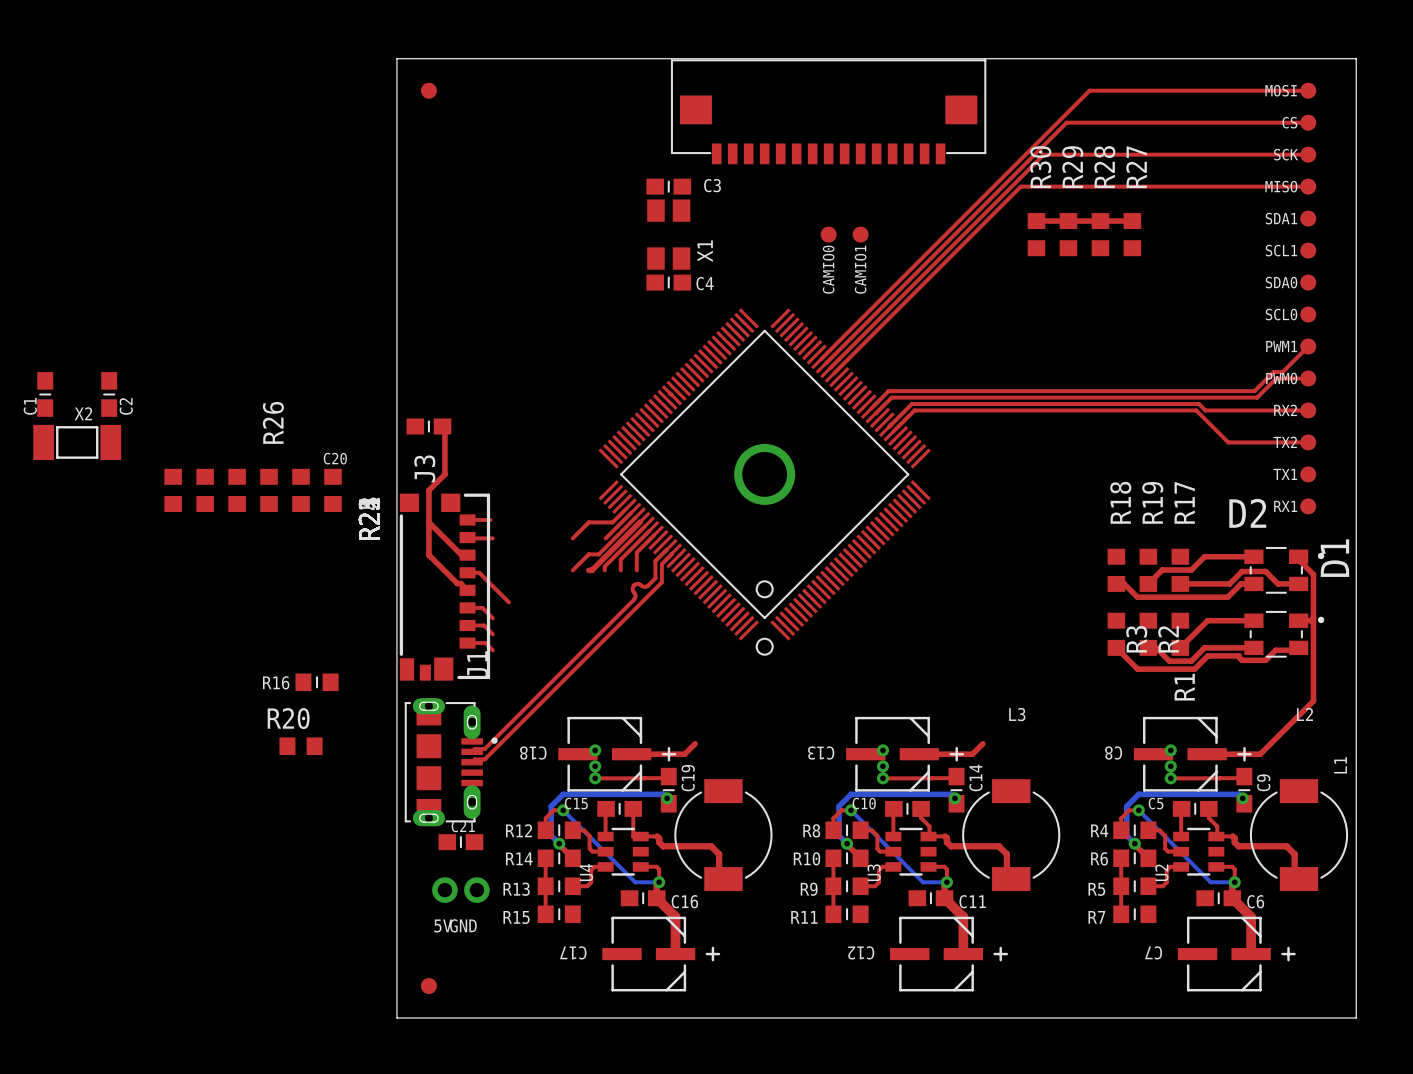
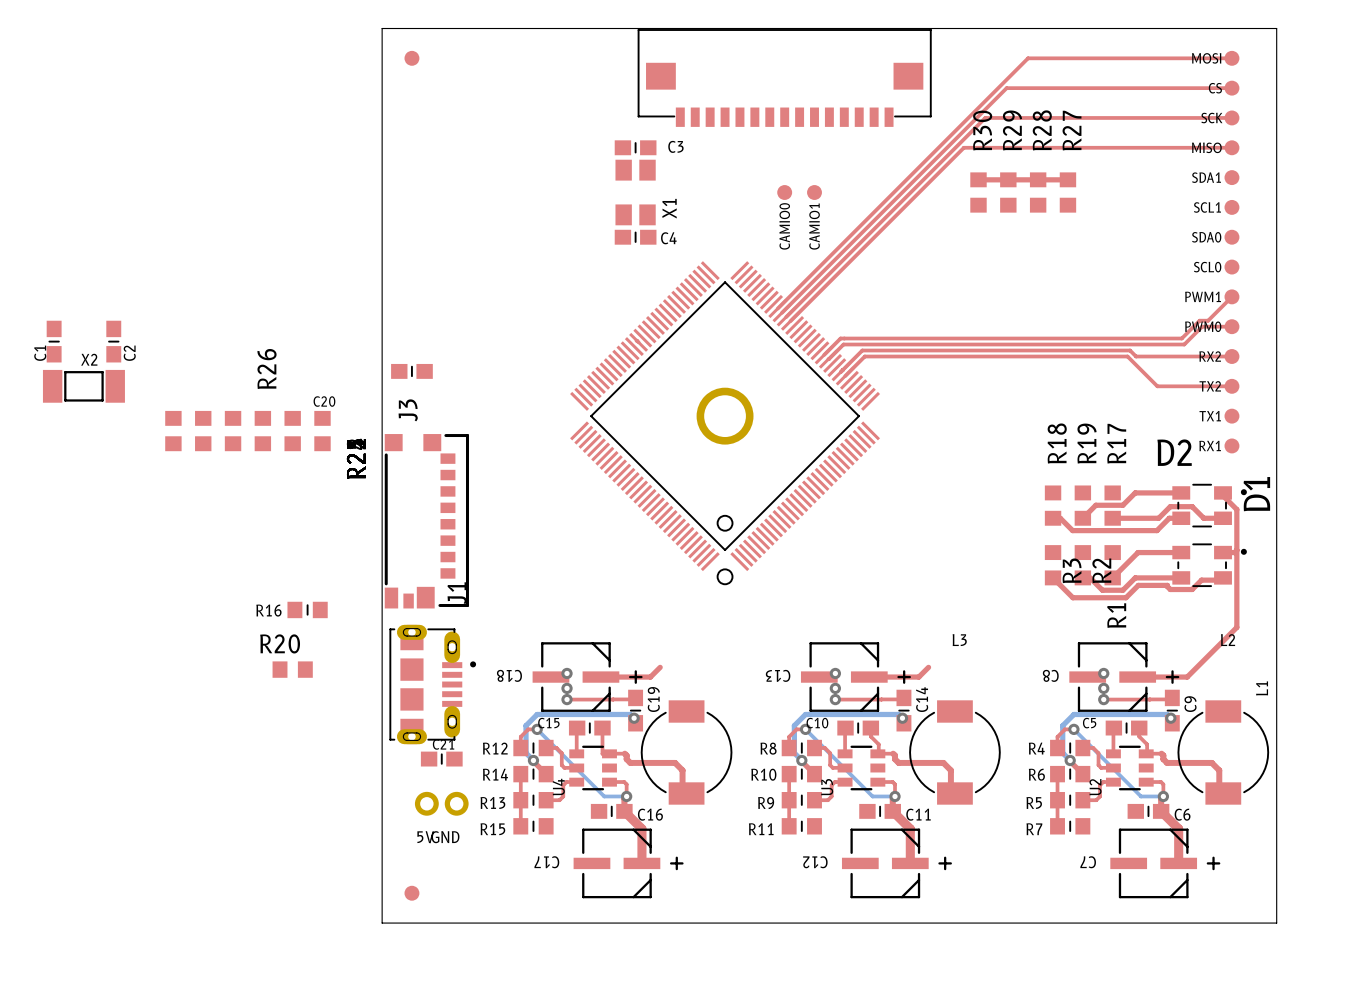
top track: (442, 426) (444, 428) (444, 474) (428, 490) (428, 555) (457, 583) (460, 583) (467, 590) -> none
top track: (626, 508) (612, 522) (588, 522) (572, 538) -> none
top track: (631, 512) (605, 538) -> none
top track: (635, 517) (598, 554) (588, 554) (572, 570) -> none
top track: (467, 519) (490, 519) -> none
top track: (640, 521) (591, 570) (588, 570) -> none
top track: (428, 522) (461, 555) (467, 555) -> none
top track: (644, 526) (604, 566) (604, 570) -> none
top track: (649, 530) (620, 559) (620, 570) -> none
top track: (653, 535) (636, 552) (636, 570) -> none
top track: (467, 537) (492, 538) -> none
top track: (667, 549) (655, 560) (655, 578) (646, 586) (638, 583) (634, 585) (634, 599) (484, 749) (474, 749) (472, 751) -> none
top track: (671, 553) (661, 564) (661, 582) (484, 759) (474, 759) (472, 762) -> none
top track: (467, 572) (479, 572) (508, 602) -> none
top track: (467, 607) (482, 607) (492, 618) -> none
top track: (467, 625) (484, 625) (492, 634) -> none
top track: (467, 643) (485, 643) (492, 650) -> none

